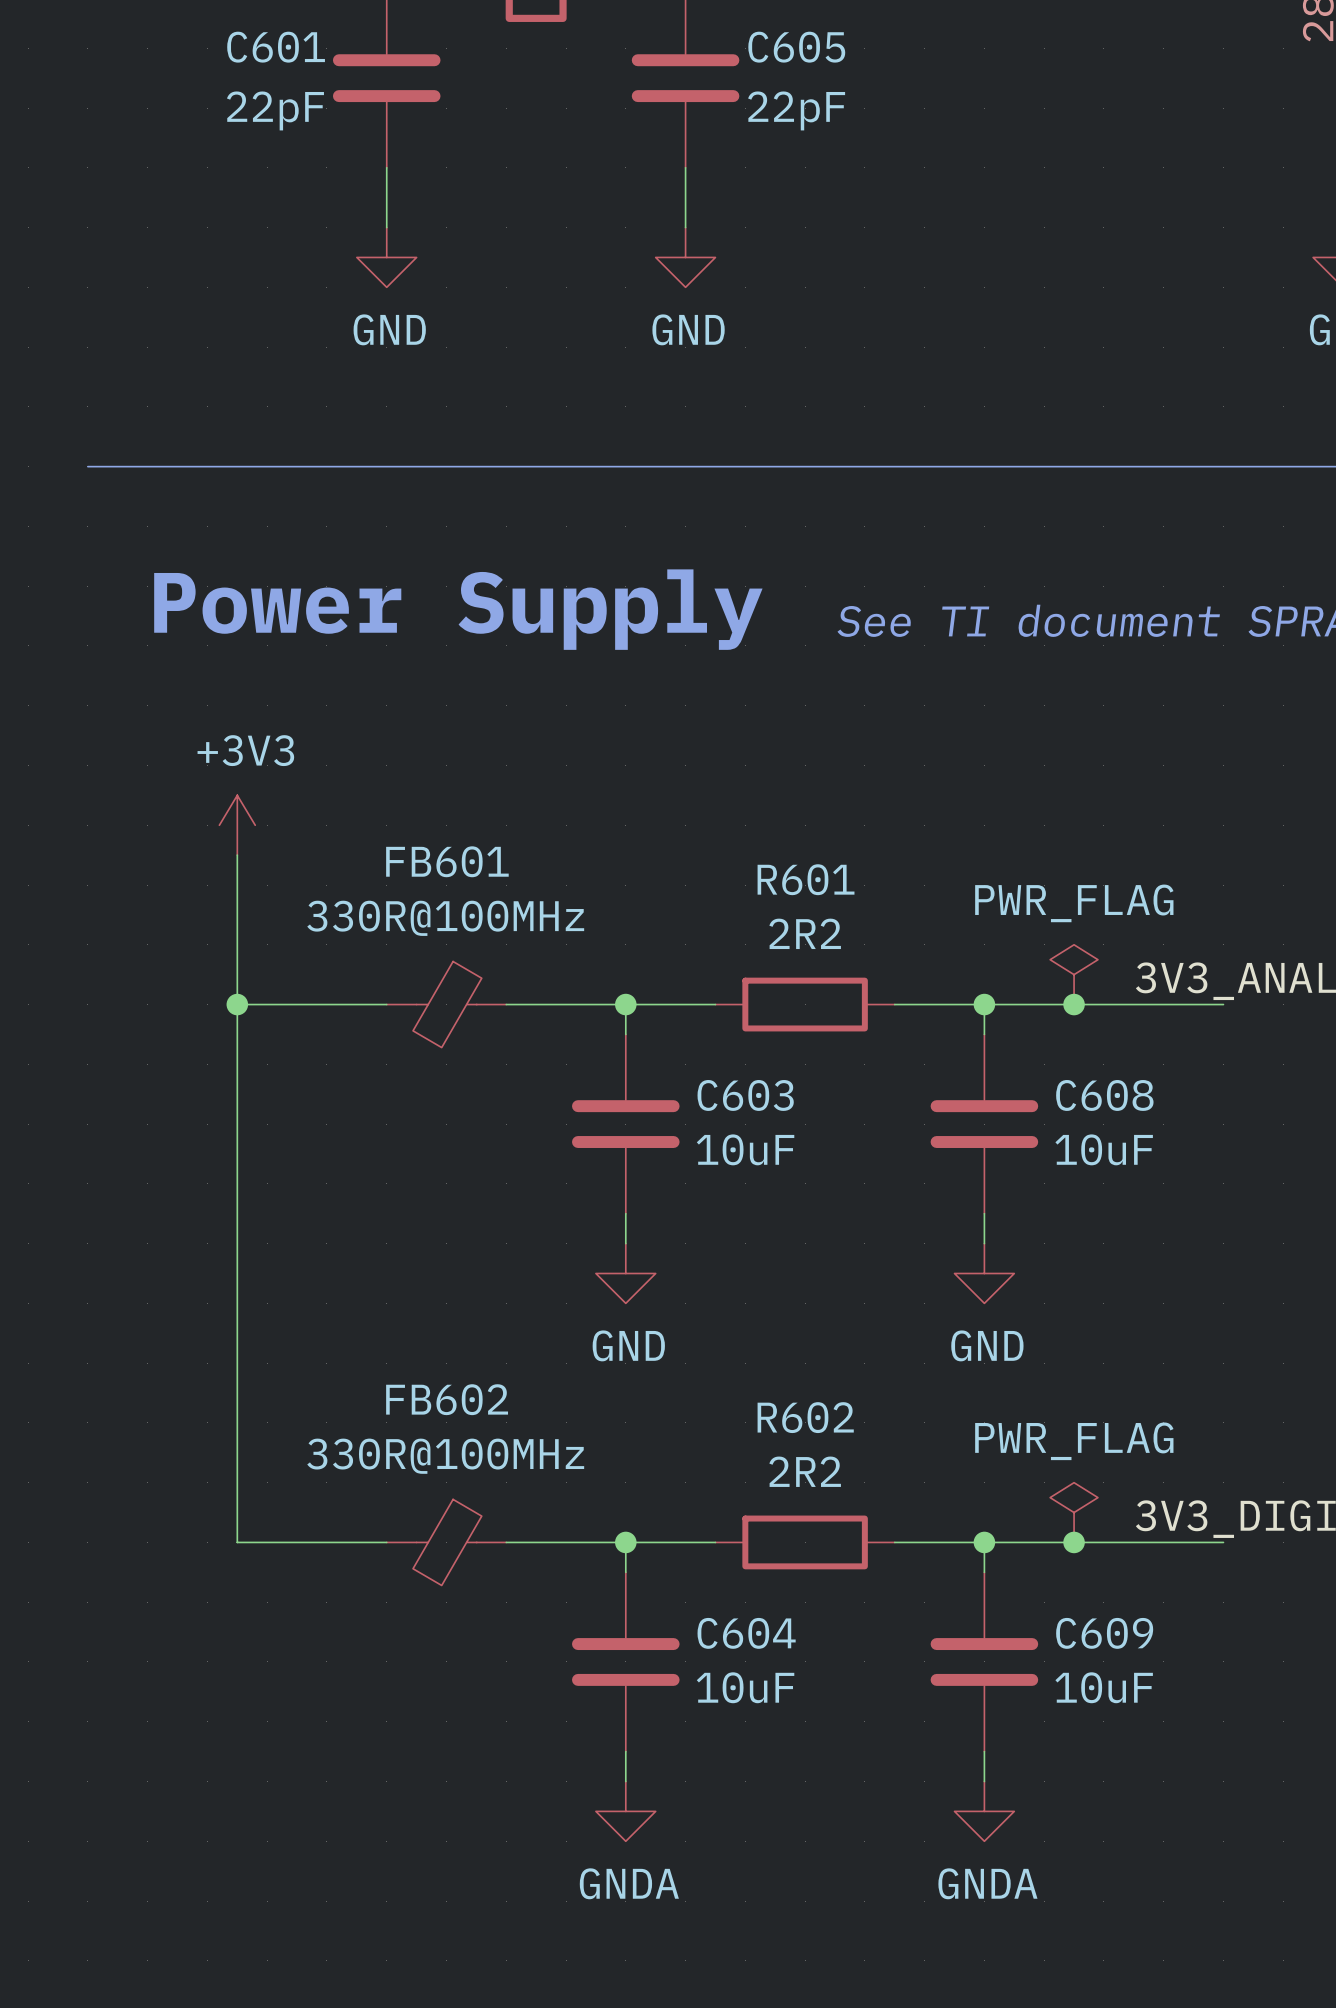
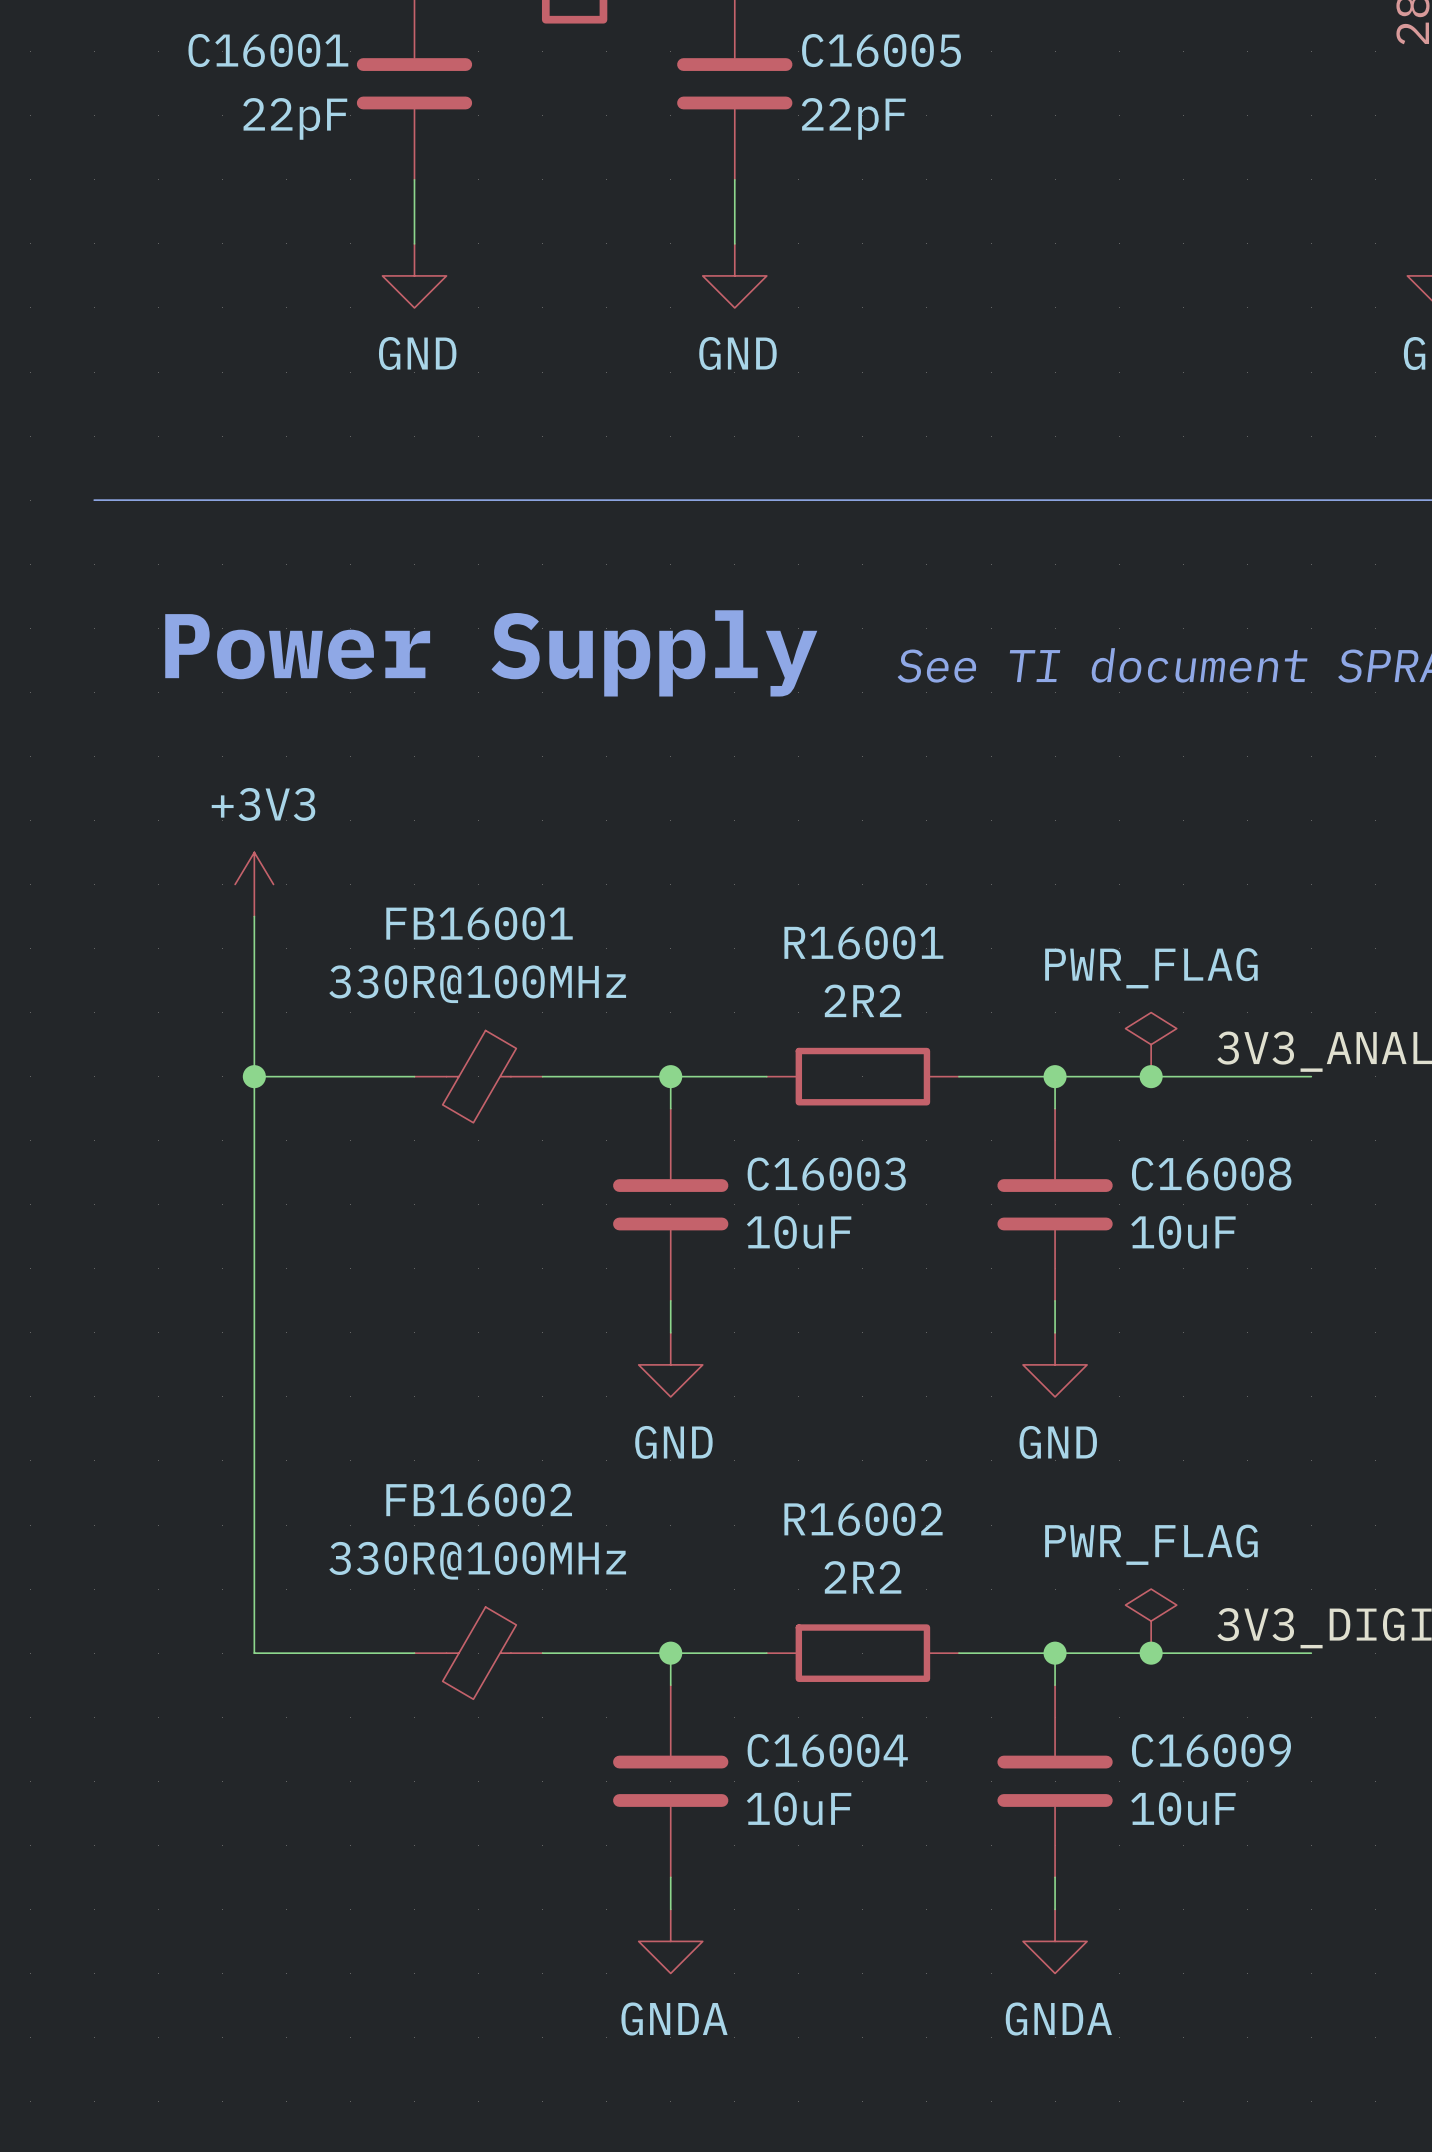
C601 name: C601 (276, 47) -> C16001 (268, 50)
C605 name: C605 (796, 47) -> C16005 (881, 50)
FB601 name: FB601 (447, 861) -> FB16001 (479, 923)
R601 name: R601 (806, 879) -> R16001 (863, 942)
C603 name: C603 (745, 1095) -> C16003 (826, 1174)
C608 name: C608 (1104, 1095) -> C16008 (1211, 1174)
FB602 name: FB602 (447, 1399) -> FB16002 (479, 1500)
R602 name: R602 (805, 1417) -> R16002 (863, 1519)
C604 name: C604 (746, 1633) -> C16004 (827, 1750)
C609 name: C609 (1104, 1633) -> C16009 (1211, 1750)

